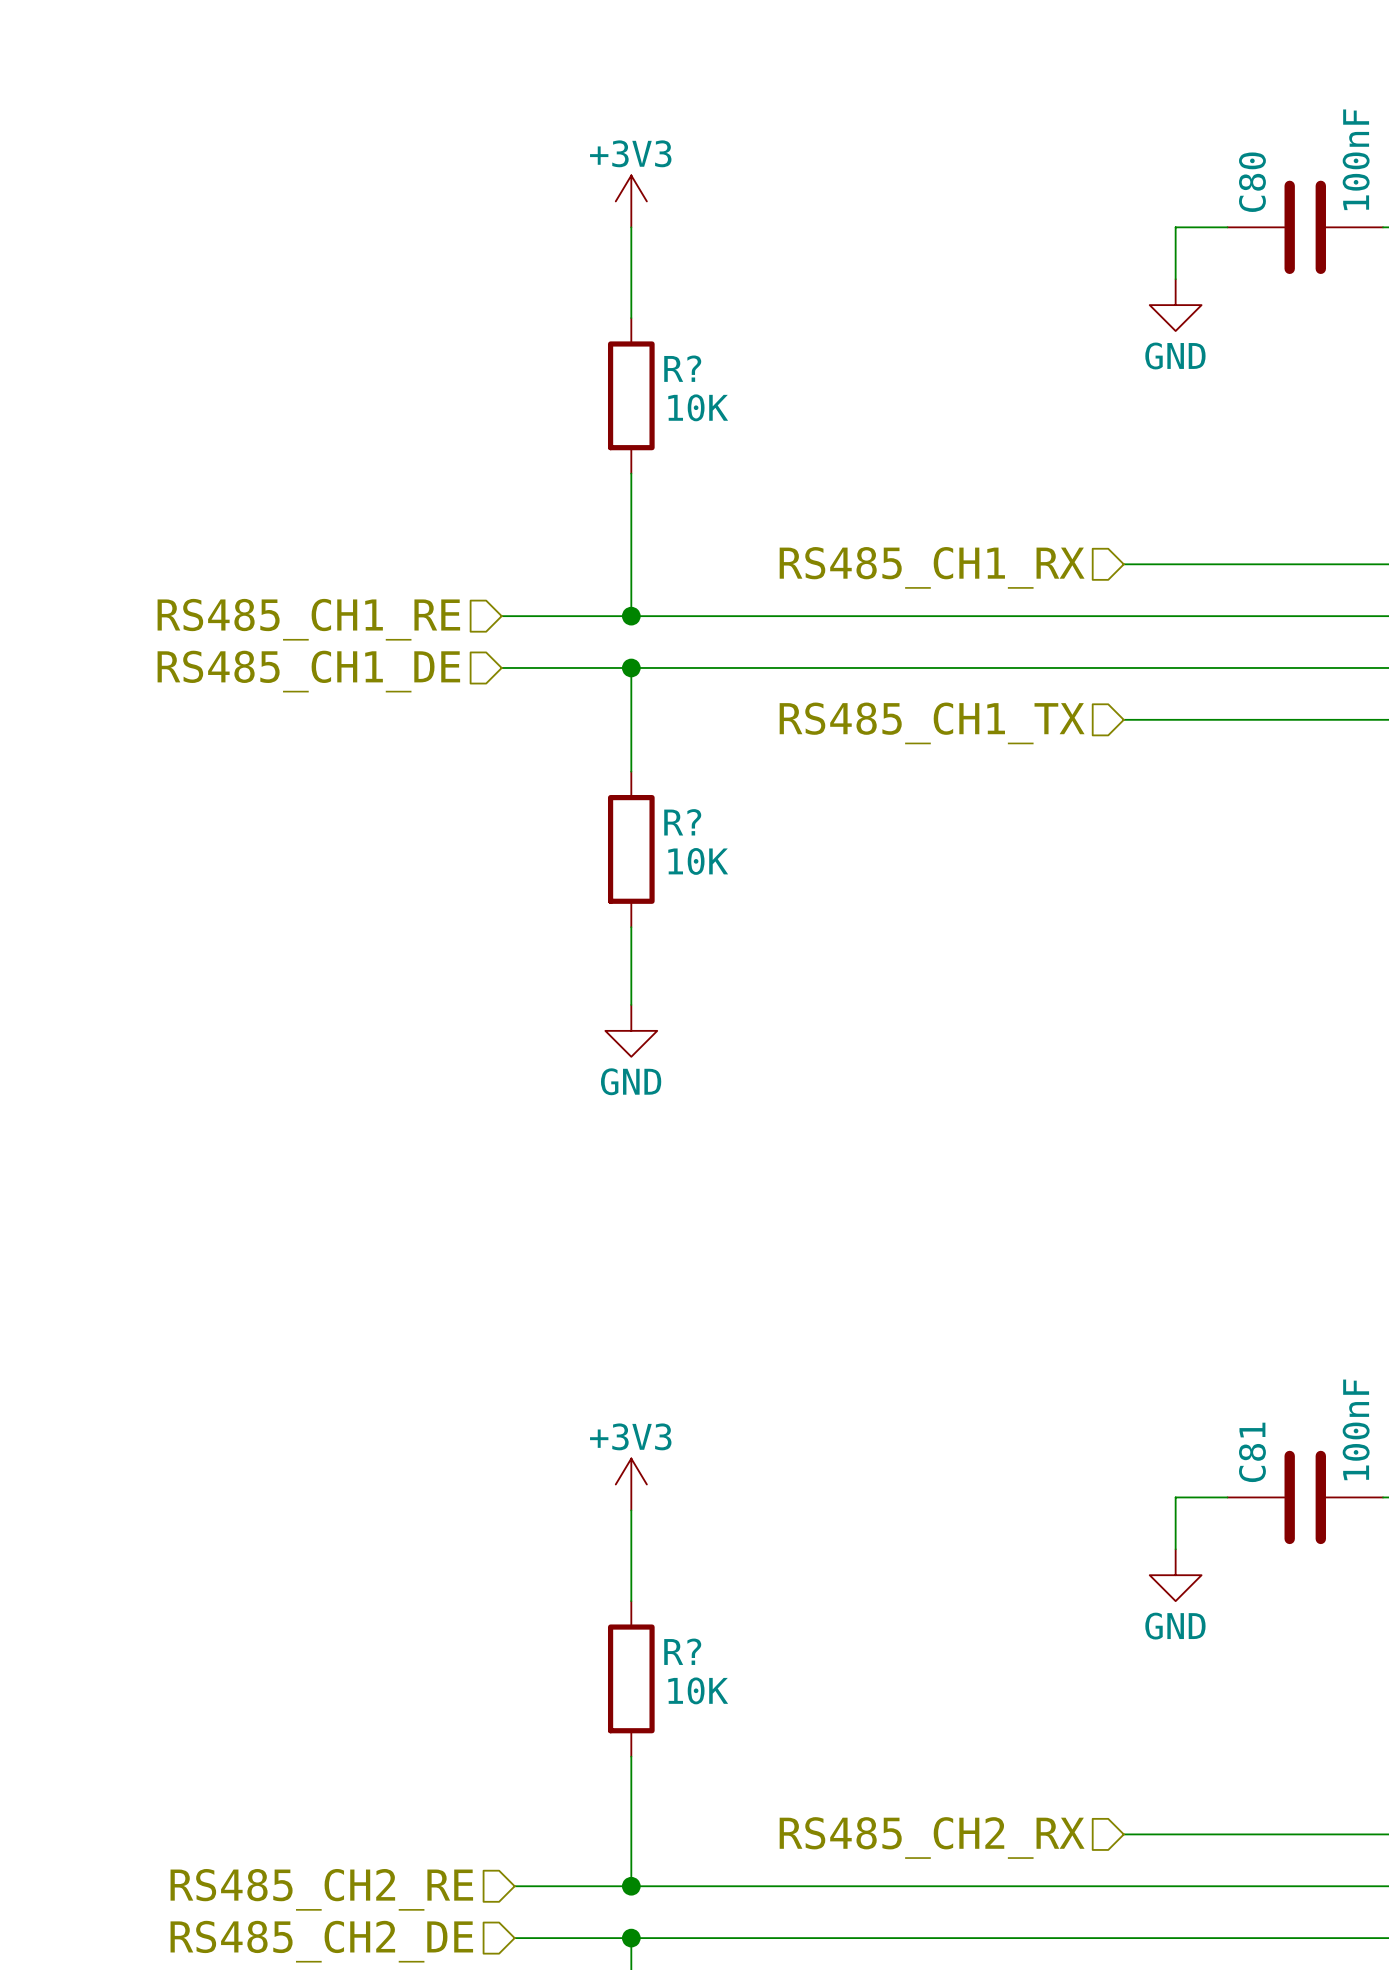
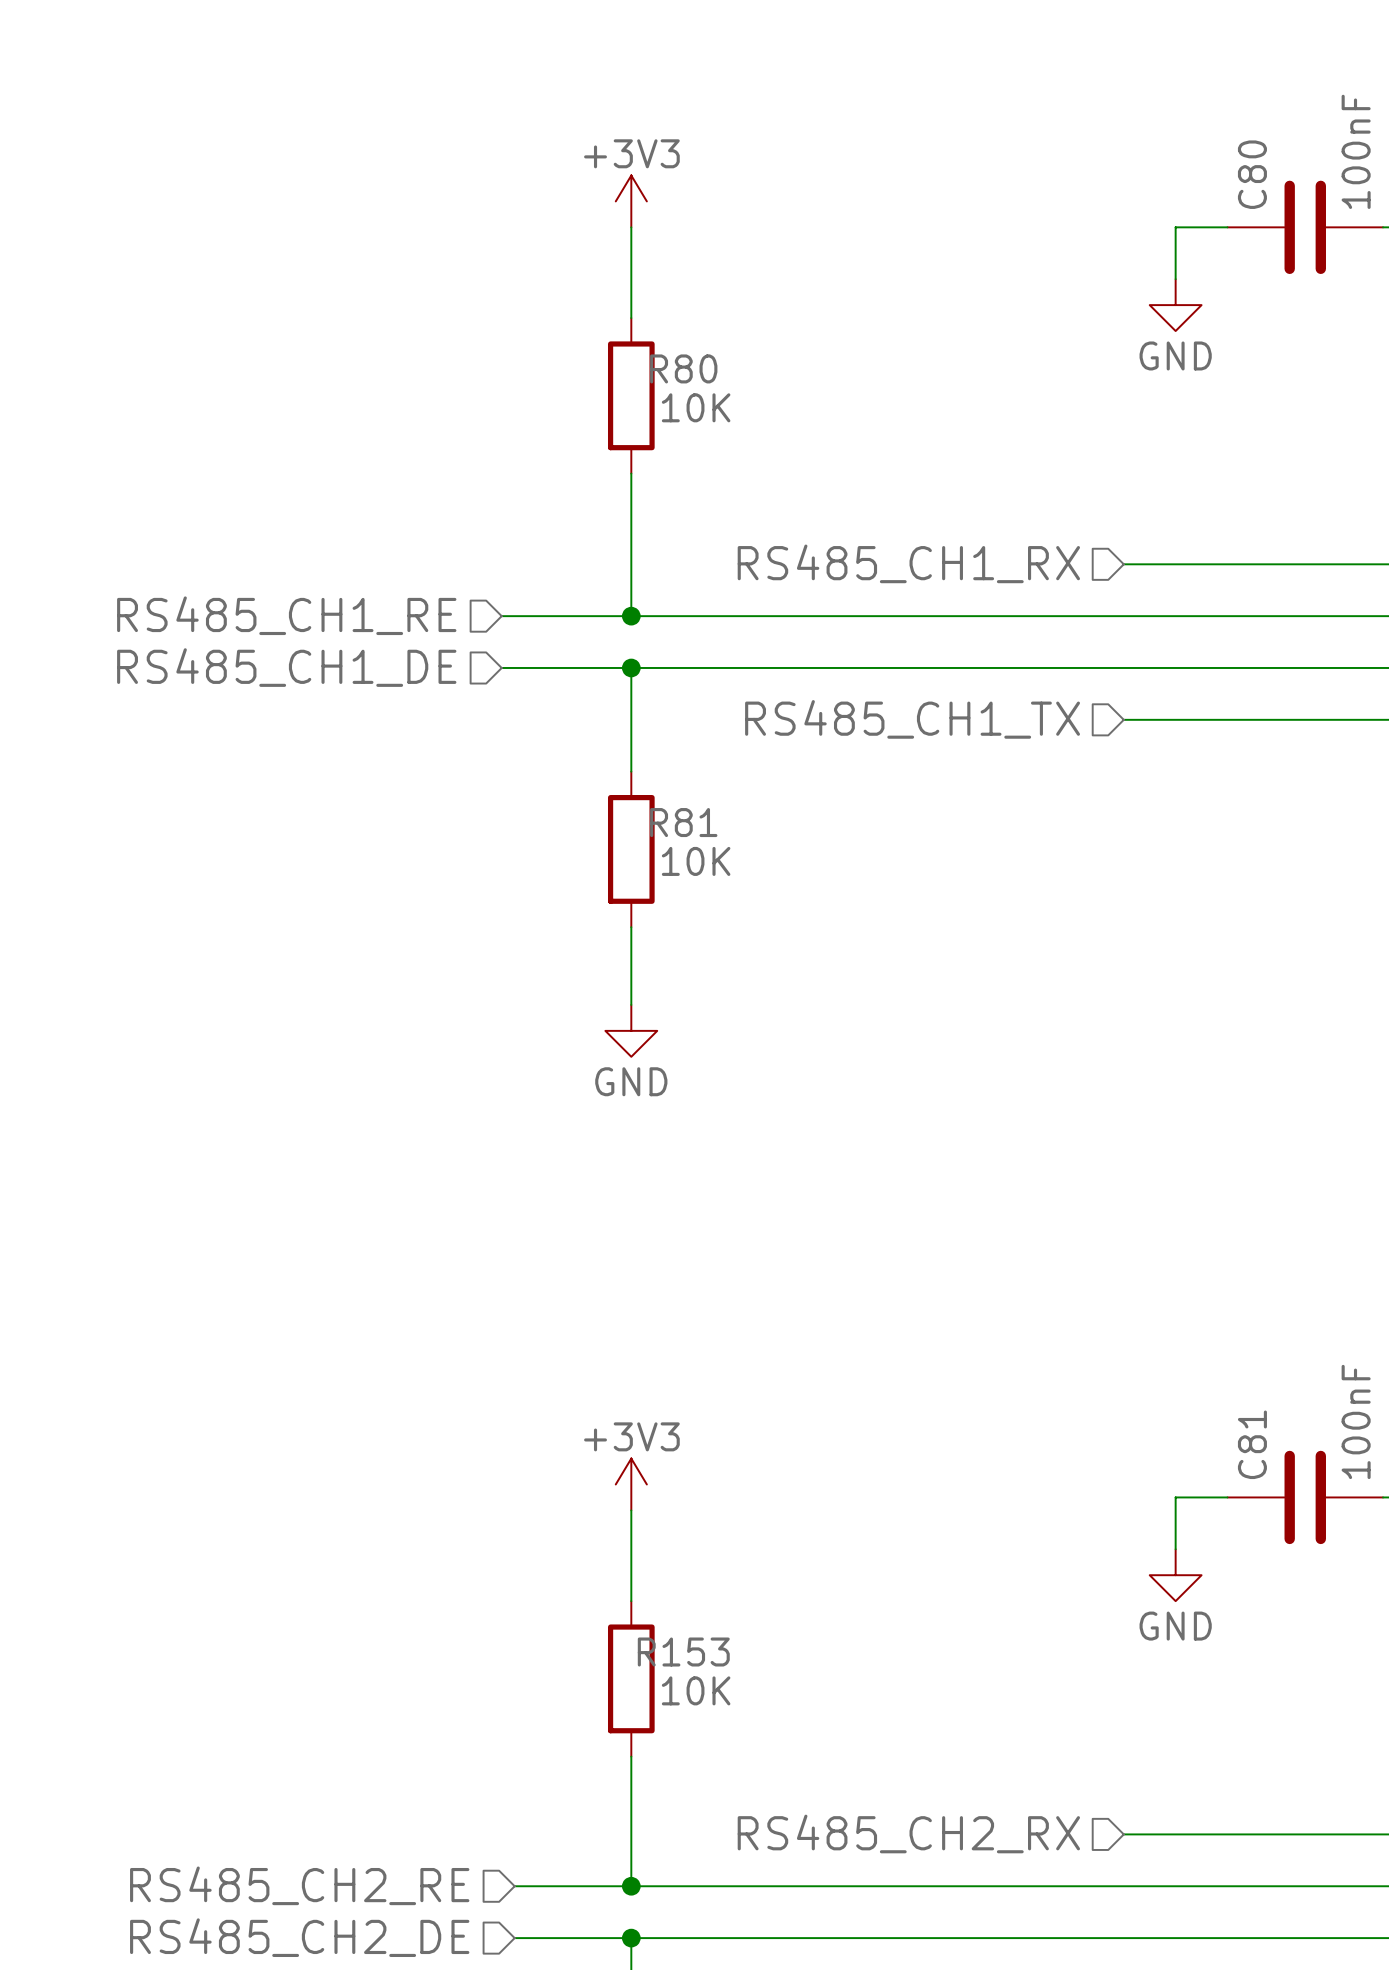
R? name: R? (682, 368) -> R80 (683, 368)
R? name: R? (682, 822) -> R81 (683, 822)
R? name: R? (682, 1651) -> R153 (683, 1652)

